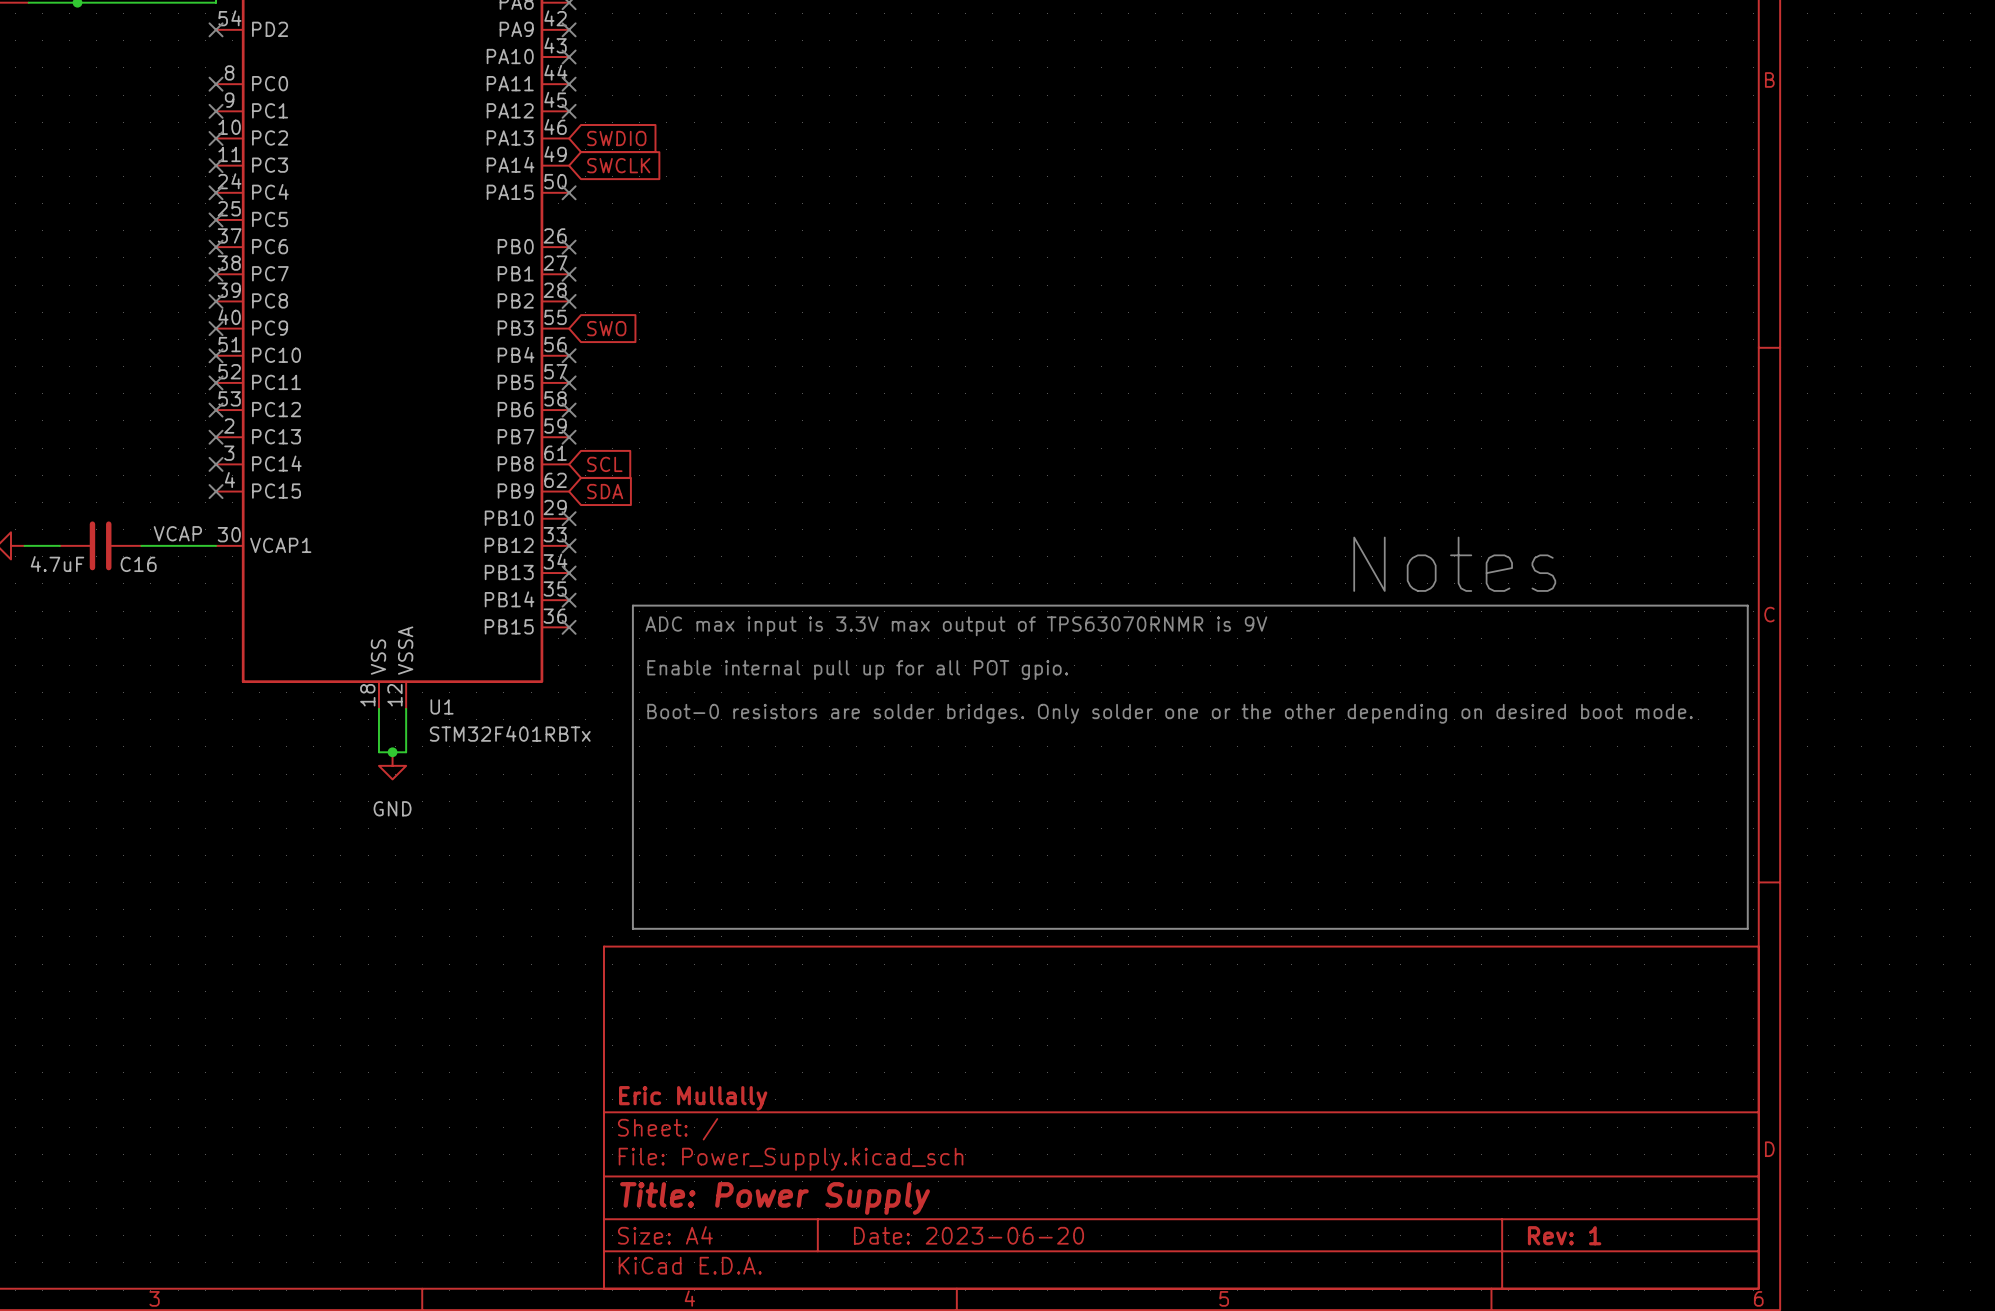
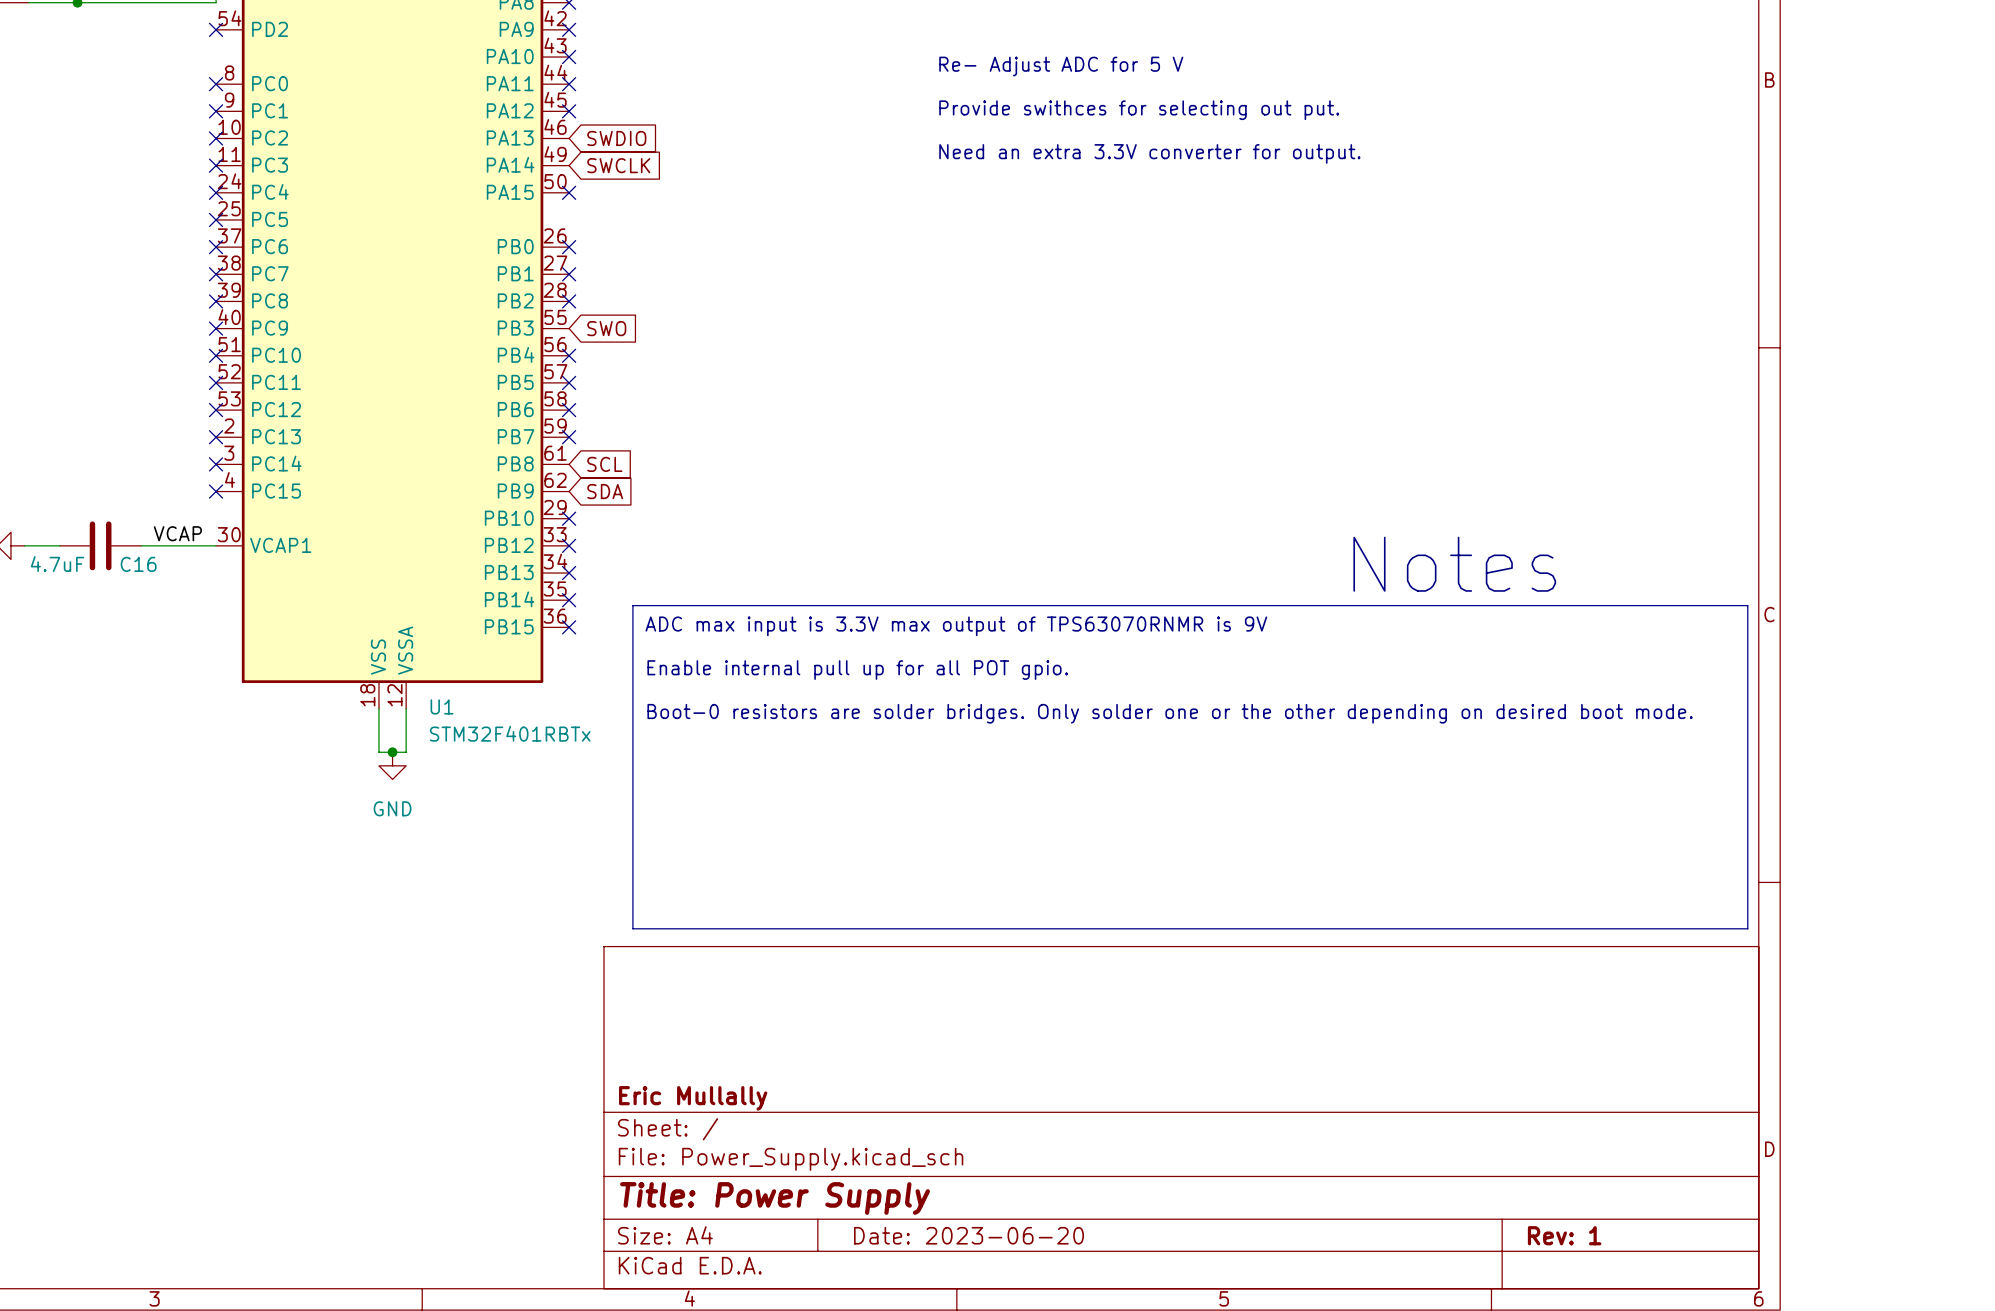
text: none -> Re- Adjust ADC for 5 V (1061, 66)
text: none -> Provide swithces for selecting out put. (1139, 110)
text: none -> Need an extra 3.3V converter for output. (1149, 153)

